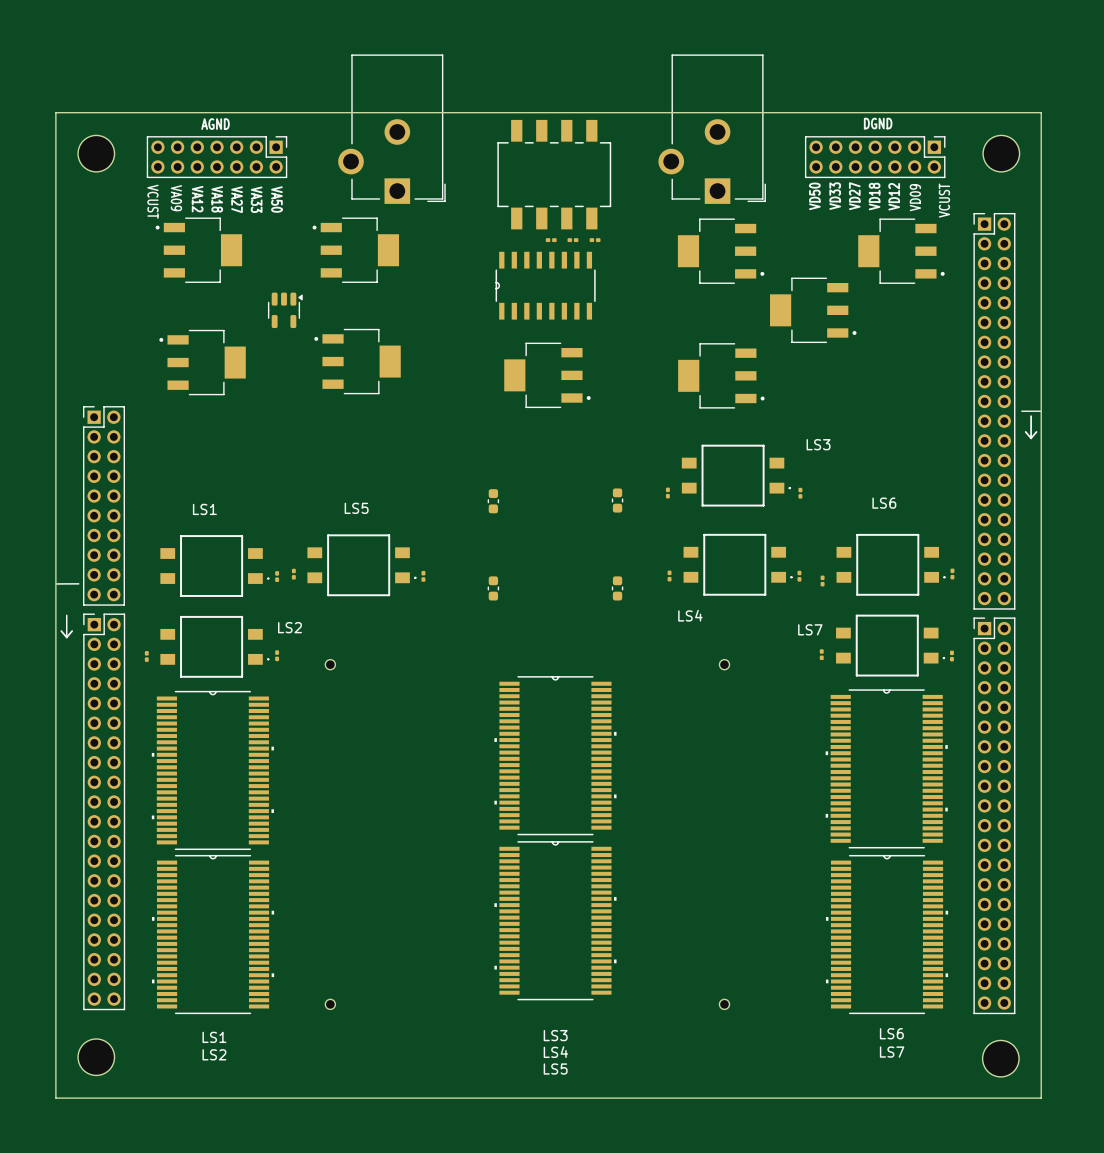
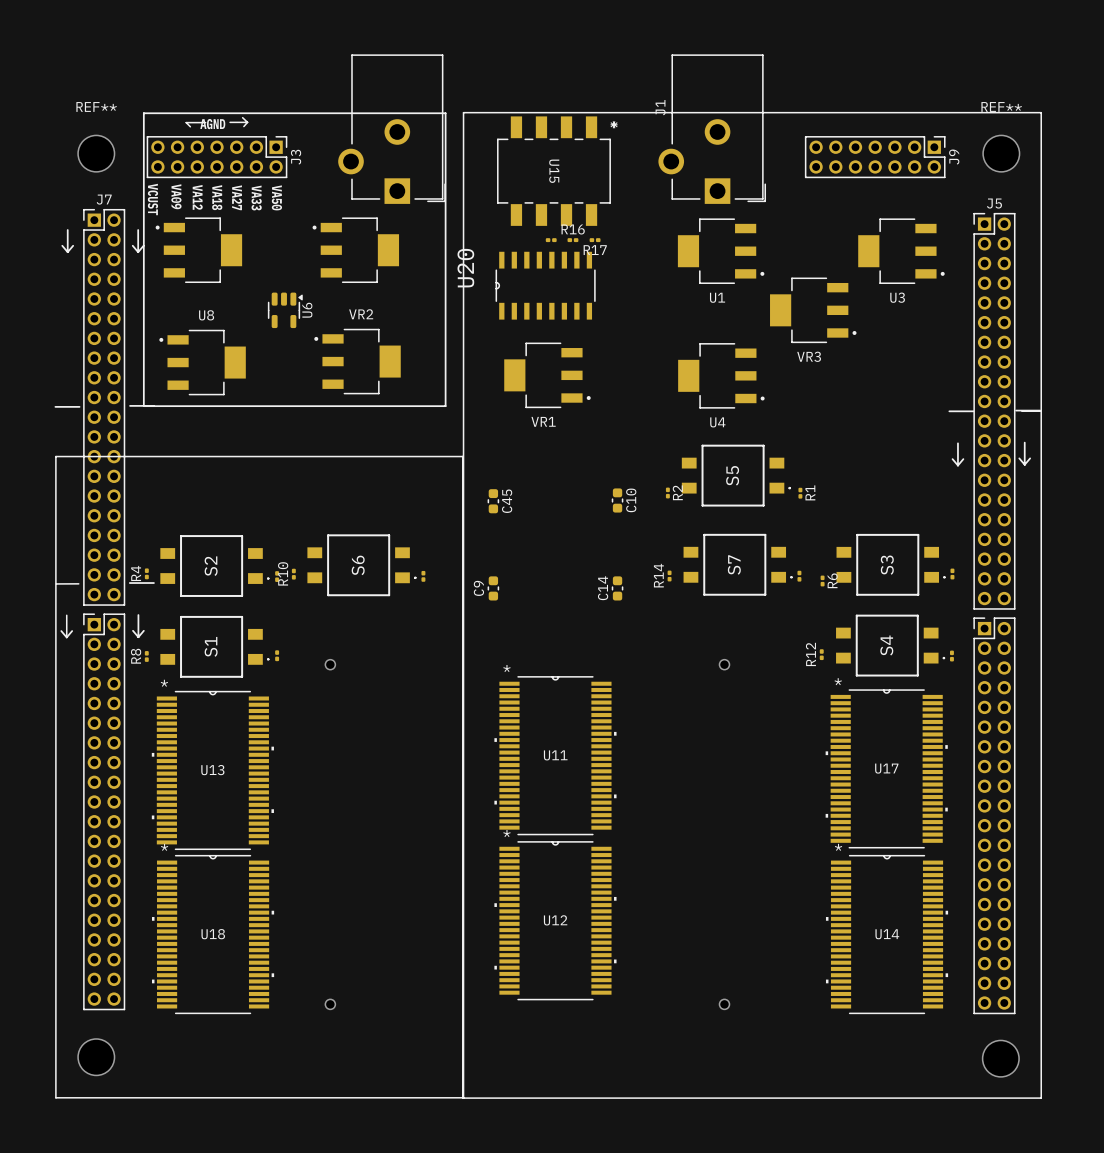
REF** name: none -> REF** (96, 106)
REF** name: none -> REF** (1001, 106)
J1 name: none -> J1 (660, 107)
board edge: (55, 112) (1041, 112) (1041, 1098) (55, 1098) (55, 112) -> none
line: none -> (463, 112) (1041, 112) (1041, 1098) (463, 1098) (463, 112)
line: none -> (143, 113) (445, 113) (445, 406) (143, 406) (143, 113)
line: none -> (242, 117) (247, 122)
U15 footprint: [497, 119, 612, 230] -> [497, 116, 611, 226]
line: none -> (205, 122) (186, 122) (190, 126)
line: none -> (230, 122) (247, 122)
line: none -> (247, 122) (243, 126)
text: DGND (878, 123) -> none
J3 name: none -> J3 (296, 157)
J9 name: none -> J9 (954, 157)
U15 name: none -> U15 (554, 171)
text: VD50 (814, 196) -> none
text: VD33 (835, 196) -> none
text: VD27 (854, 196) -> none
text: VD18 (874, 196) -> none
text: VD12 (894, 196) -> none
text: VD09 (915, 197) -> none
text: VCUST (944, 200) -> none
J5 name: none -> J5 (994, 203)
R16 name: none -> R16 (573, 229)
line: none -> (67, 230) (67, 252)
line: none -> (138, 230) (138, 252)
line: none -> (62, 245) (67, 252)
line: none -> (73, 245) (67, 252)
line: none -> (132, 245) (138, 252)
line: none -> (143, 245) (138, 252)
R17 name: none -> R17 (595, 250)
U20 name: none -> U20 (465, 268)
U1 name: none -> U1 (717, 297)
U3 name: none -> U3 (897, 297)
U6 name: none -> U6 (307, 310)
VR2 name: none -> VR2 (361, 314)
U8 name: none -> U8 (206, 315)
VR3 name: none -> VR3 (809, 356)
line: none -> (130, 405) (154, 405)
line: none -> (55, 406) (79, 406)
J7: none -> (104, 407)
line: none -> (1016, 410) (1040, 410)
line: none -> (949, 411) (973, 411)
line: (1031, 416) (1031, 438) -> (1024, 442) (1024, 464)
VR1 name: none -> VR1 (543, 421)
U4 name: none -> U4 (717, 422)
line: (1025, 431) (1031, 438) -> (1019, 458) (1024, 464)
line: (1036, 431) (1031, 438) -> (1030, 458) (1024, 464)
line: none -> (957, 443) (957, 465)
text: LS3 (818, 444) -> none
line: none -> (55, 456) (462, 456) (462, 1097) (55, 1097) (55, 456)
line: none -> (952, 459) (957, 465)
line: none -> (963, 459) (957, 465)
S5 name: none -> S5 (732, 475)
R2 name: none -> R2 (677, 492)
R1 name: none -> R1 (810, 492)
C10 name: none -> C10 (631, 500)
C45 name: none -> C45 (507, 501)
text: LS6 (884, 503) -> none
part: (103, 505) -> none
text: LS5 (356, 508) -> none
text: LS1 (204, 509) -> none
S7 name: none -> S7 (734, 565)
S3 name: none -> S3 (887, 565)
S6 name: none -> S6 (358, 565)
S2 name: none -> S2 (211, 566)
R4: none -> (146, 573)
R10 name: none -> R10 (283, 573)
R14 name: none -> R14 (658, 575)
R6 name: none -> R6 (832, 580)
line: none -> (129, 583) (153, 583)
C9 name: none -> C9 (478, 588)
C14 name: none -> C14 (603, 588)
line: none -> (138, 615) (138, 637)
text: LS4 (690, 615) -> none
text: LS2 (290, 627) -> none
text: LS7 (810, 629) -> none
line: none -> (133, 630) (138, 637)
line: none -> (143, 630) (138, 637)
S4 name: none -> S4 (886, 645)
S1 name: none -> S1 (211, 646)
R12 name: none -> R12 (810, 654)
R8 name: none -> R8 (136, 656)
U11 text: none -> * (506, 668)
U17 text: none -> * (838, 681)
U13 text: none -> * (164, 683)
U11 name: none -> U11 (555, 755)
U17 name: none -> U17 (886, 768)
U13 name: none -> U13 (212, 770)
U12 text: none -> * (506, 833)
U18 text: none -> * (164, 847)
U14 text: none -> * (838, 847)
U12 name: none -> U12 (555, 920)
U14 name: none -> U14 (887, 934)
U18 name: none -> U18 (213, 934)
text: LS6 (891, 1033) -> none
text: LS3 (555, 1035) -> none
text: LS1 (214, 1037) -> none
text: LS4 (555, 1052) -> none
text: LS7 (892, 1052) -> none
text: LS2 (214, 1054) -> none
text: LS5 (555, 1069) -> none

